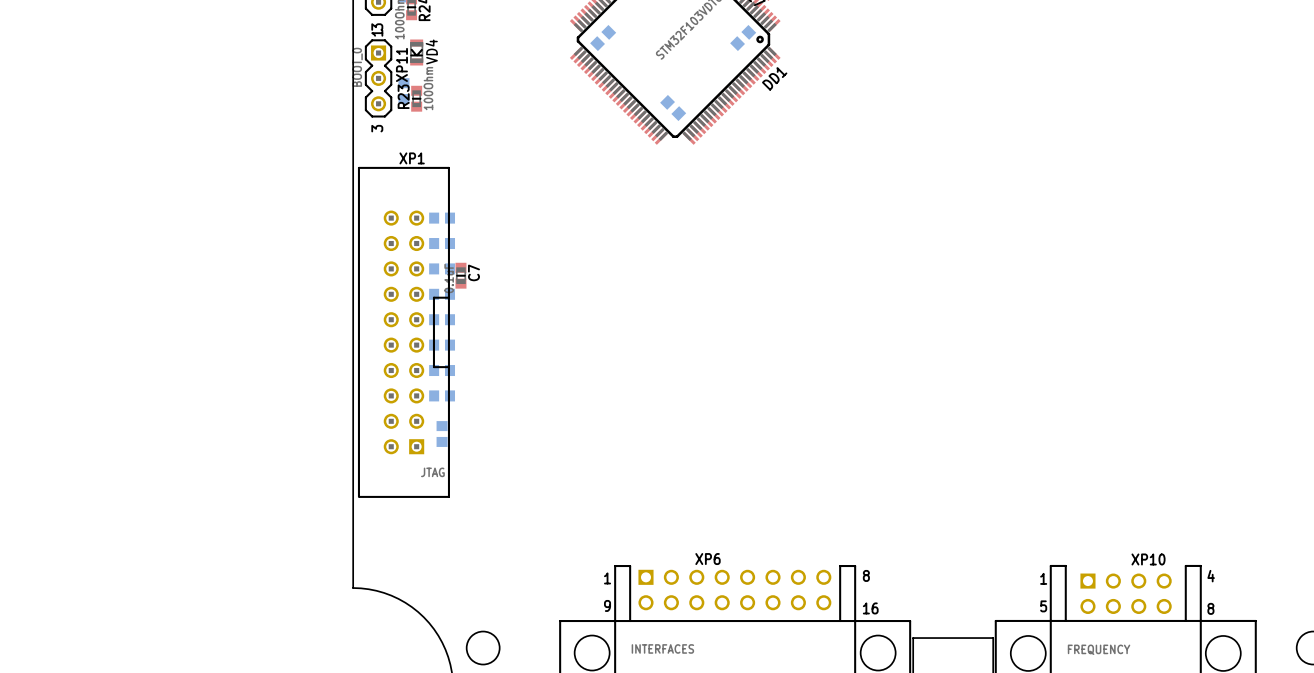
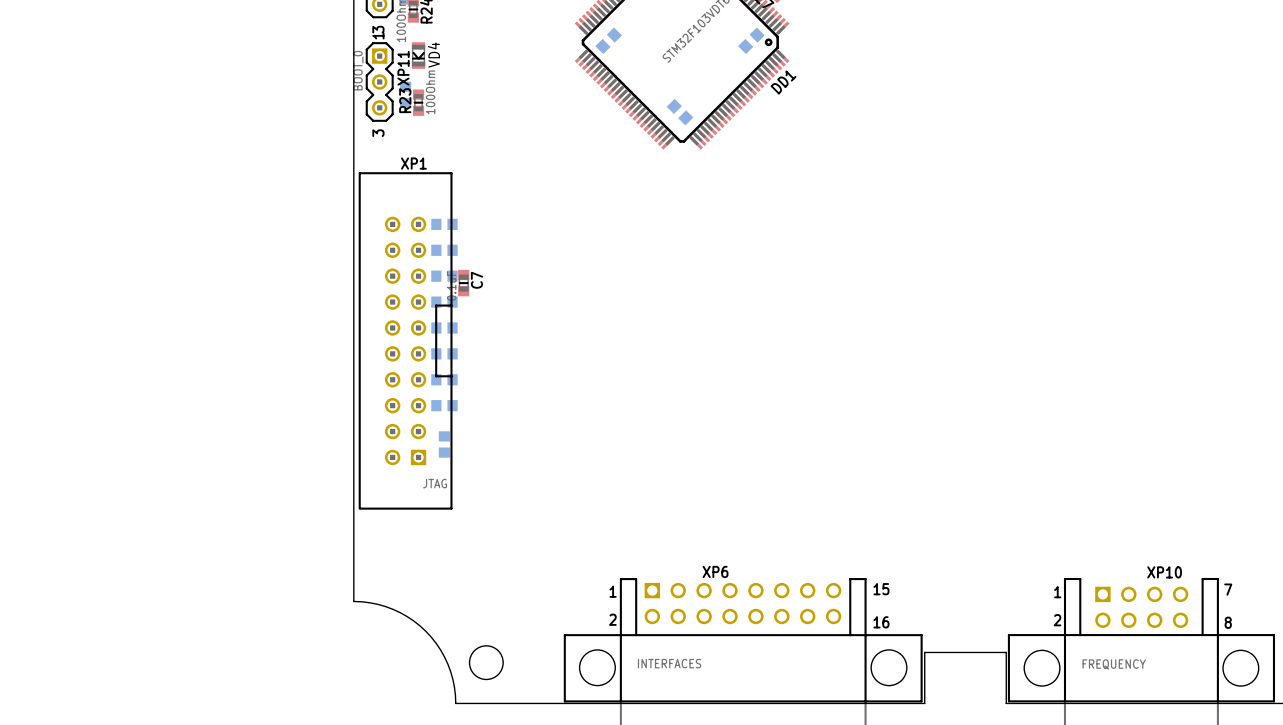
XP6 text: 8 (866, 575) -> 15 (881, 589)
XP10 text: 4 (1211, 576) -> 7 (1228, 589)
XP6 text: 9 (607, 605) -> 2 (612, 619)
XP10 text: 5 (1043, 606) -> 2 (1057, 620)

